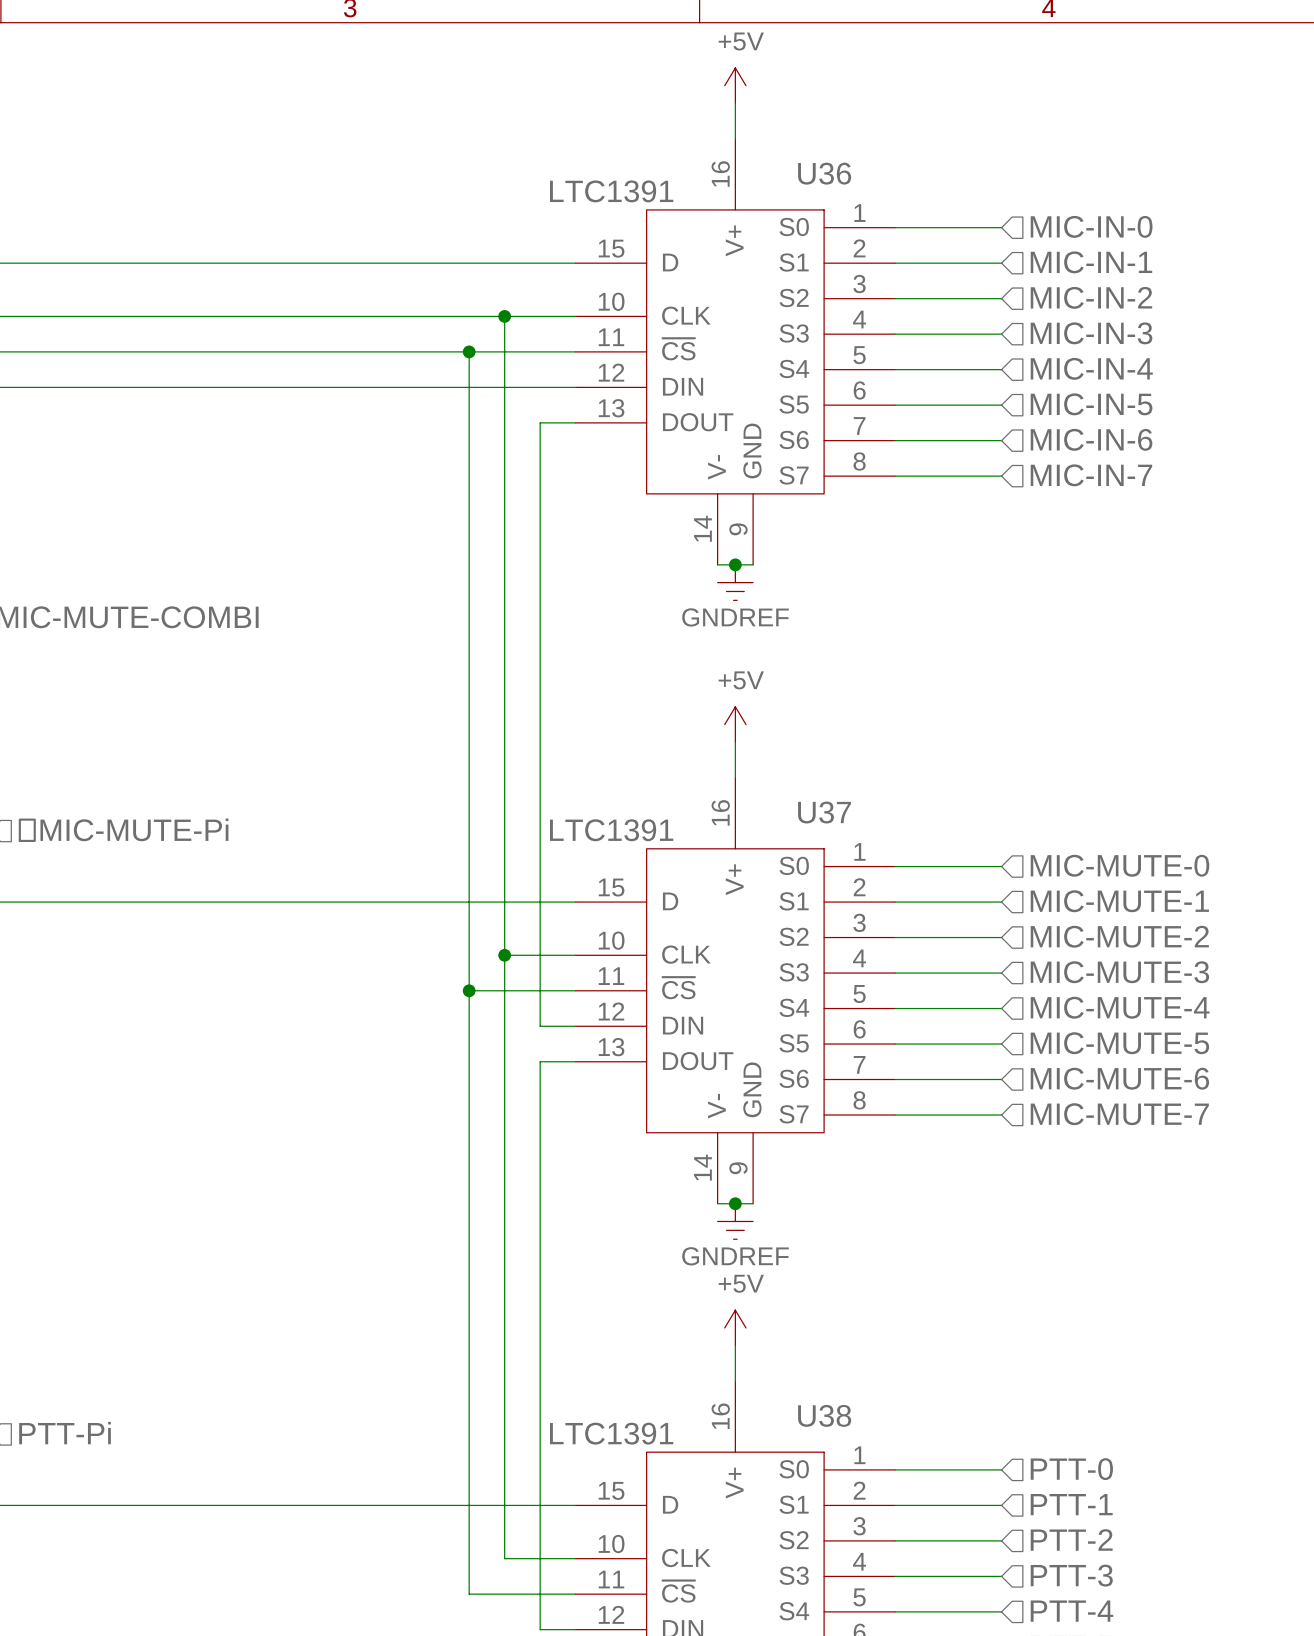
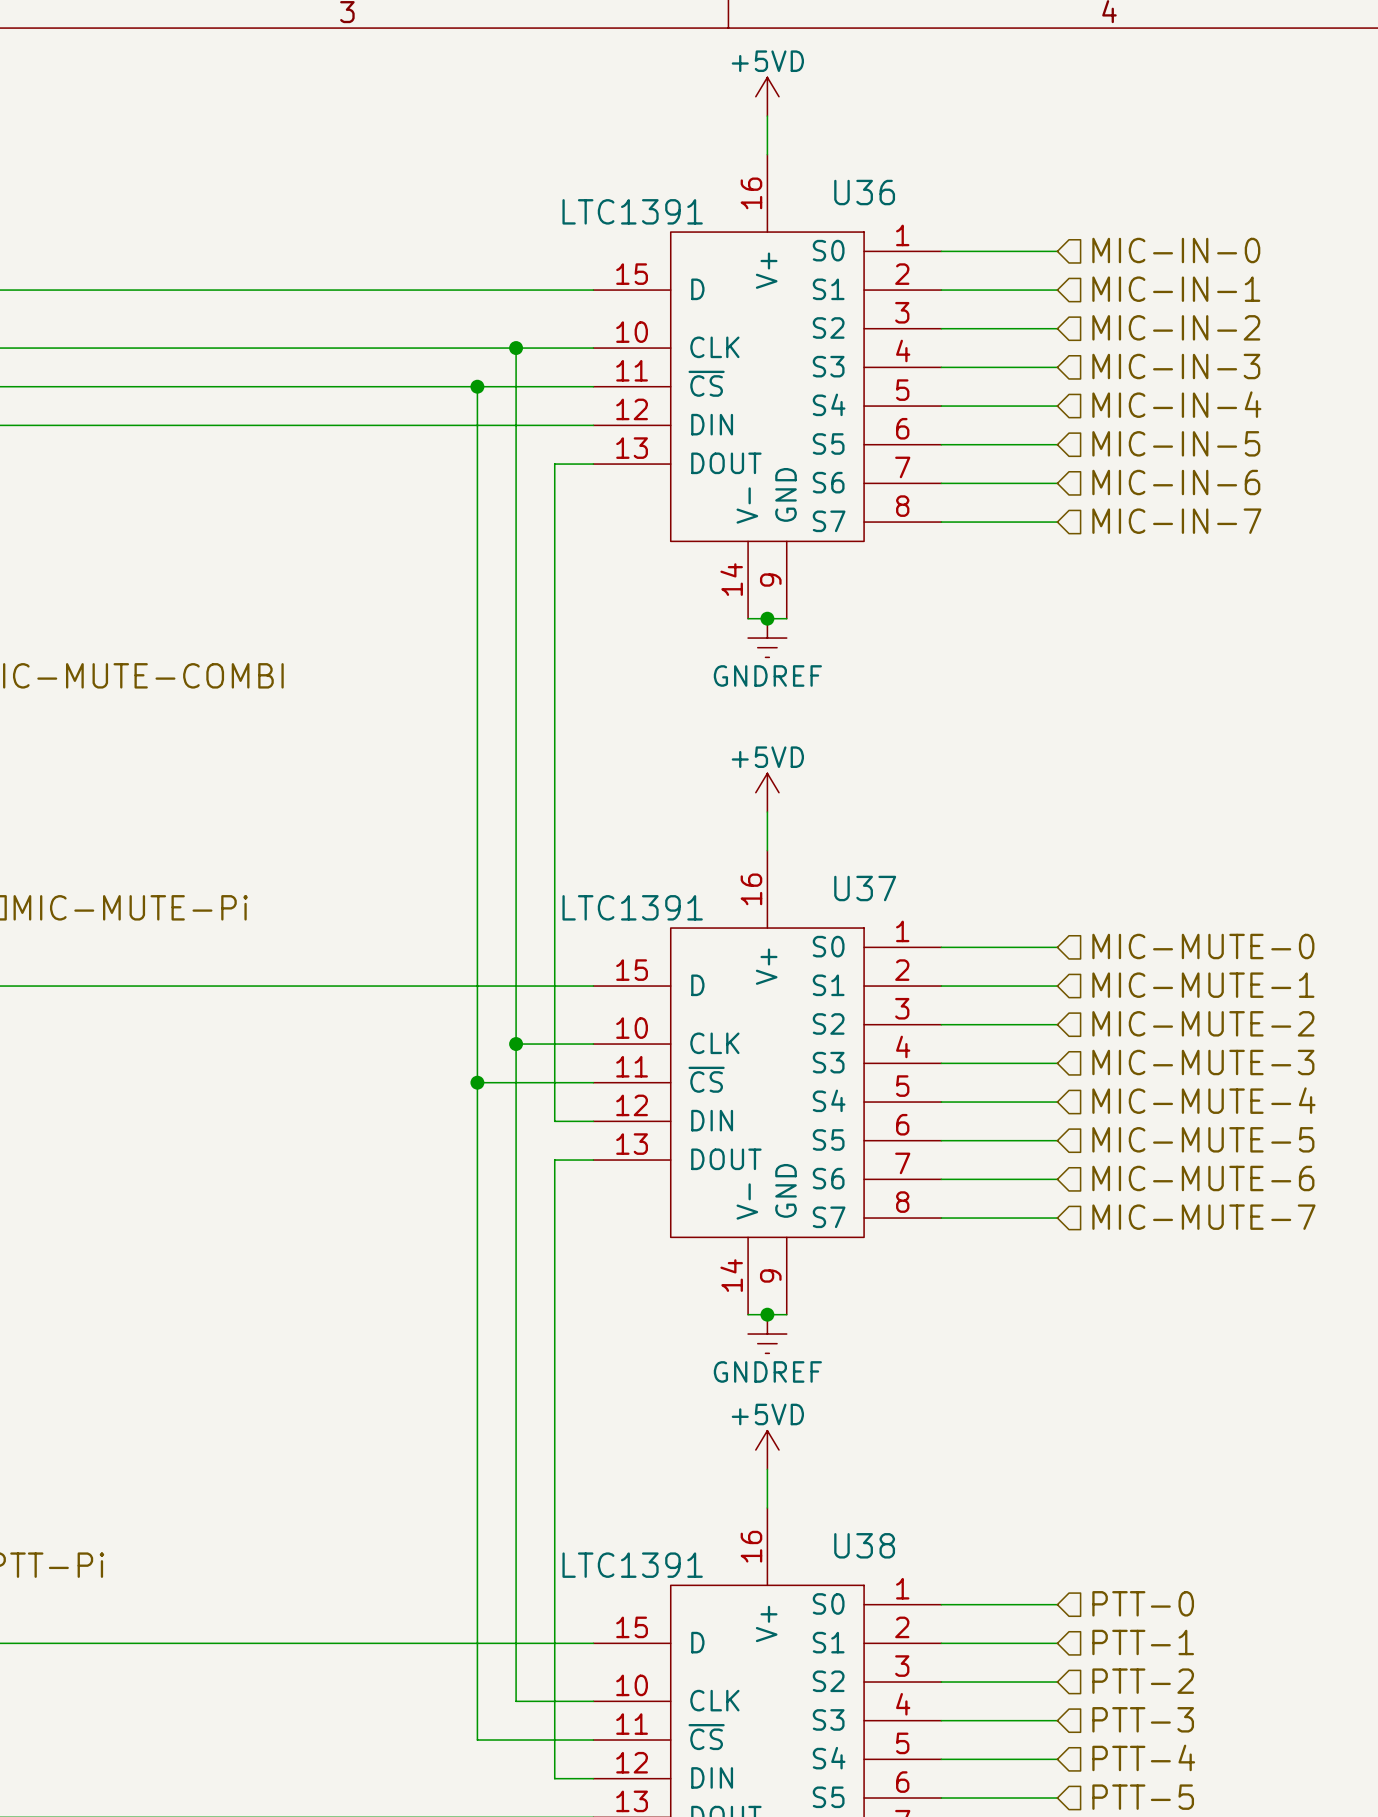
power symbol: +5V (735, 85) -> +5VD (767, 96)
power symbol: +5V (735, 724) -> +5VD (767, 792)
power symbol: +5V (735, 1327) -> +5VD (767, 1450)

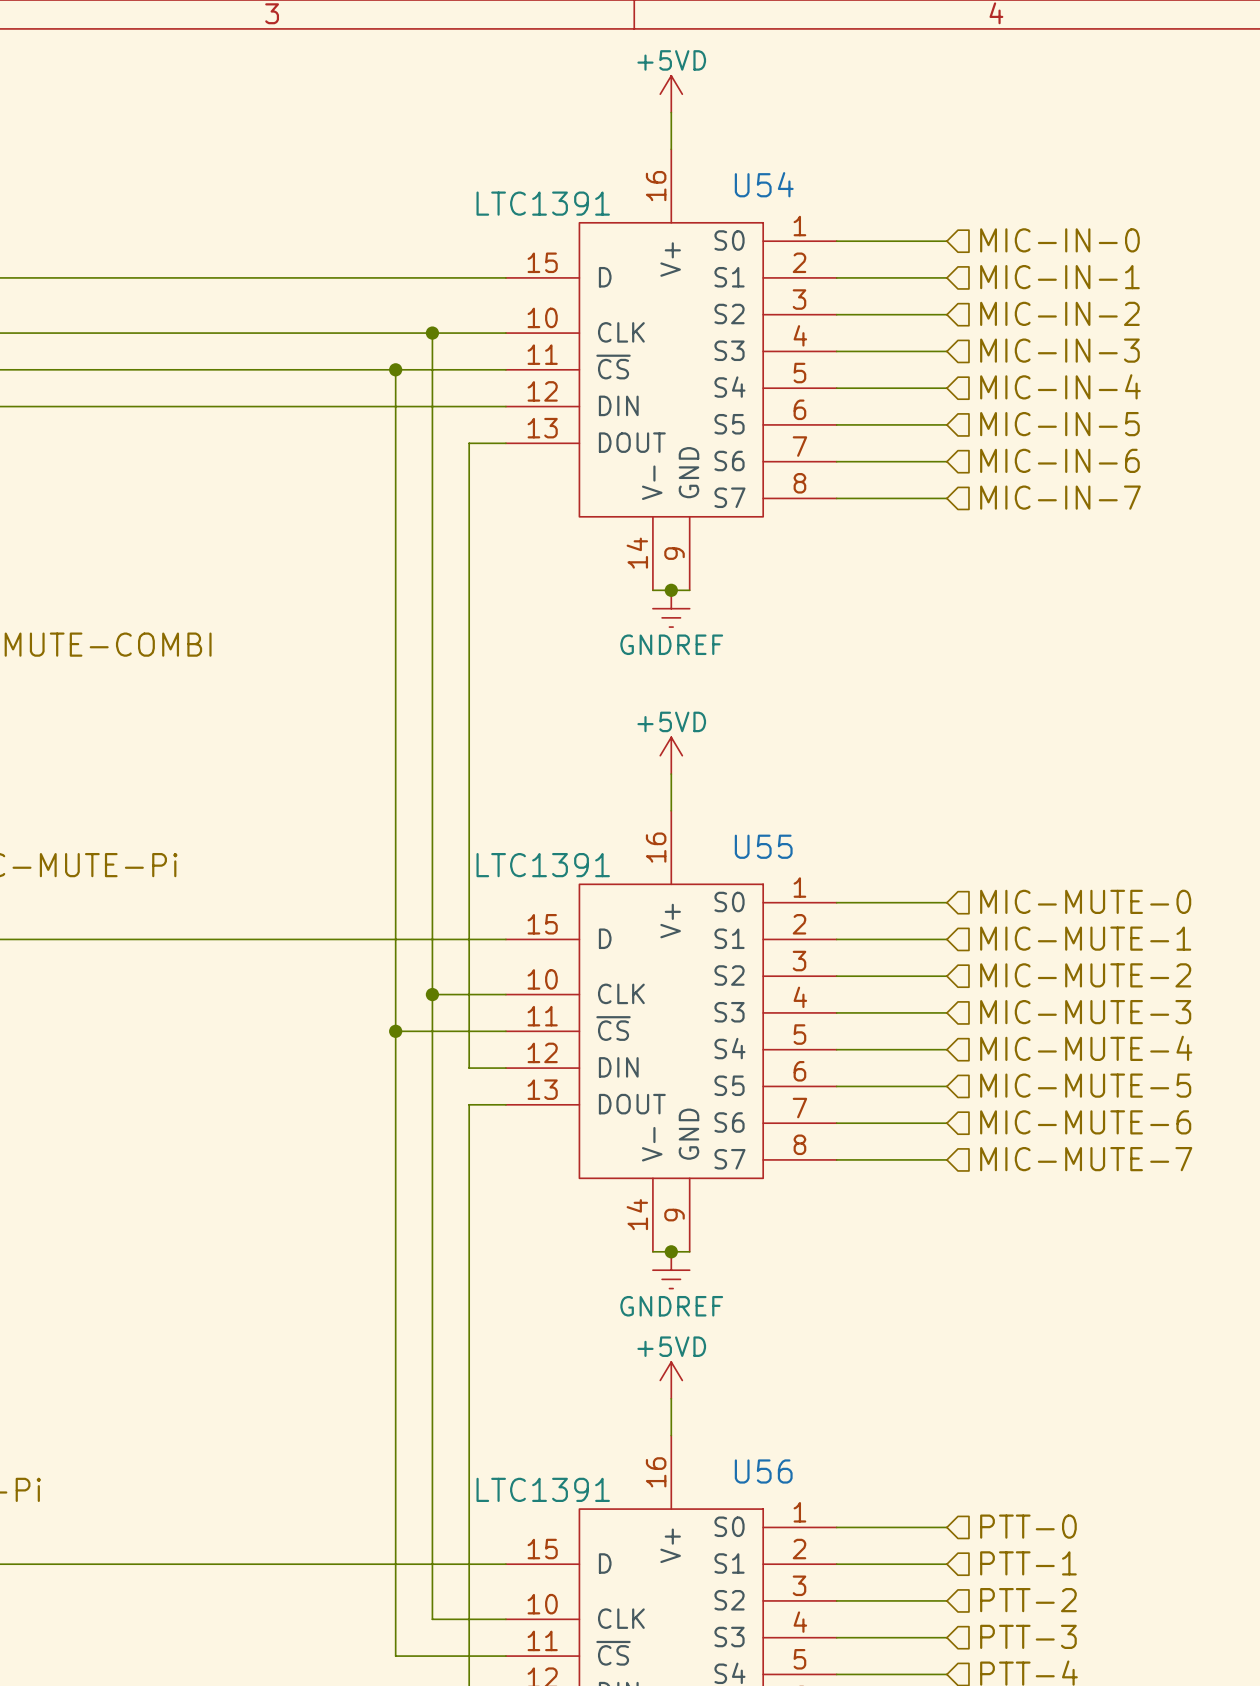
U36 name: U36 (864, 192) -> U54 (764, 184)
U37 name: U37 (865, 888) -> U55 (763, 846)
U38 name: U38 (864, 1545) -> U56 (763, 1471)

